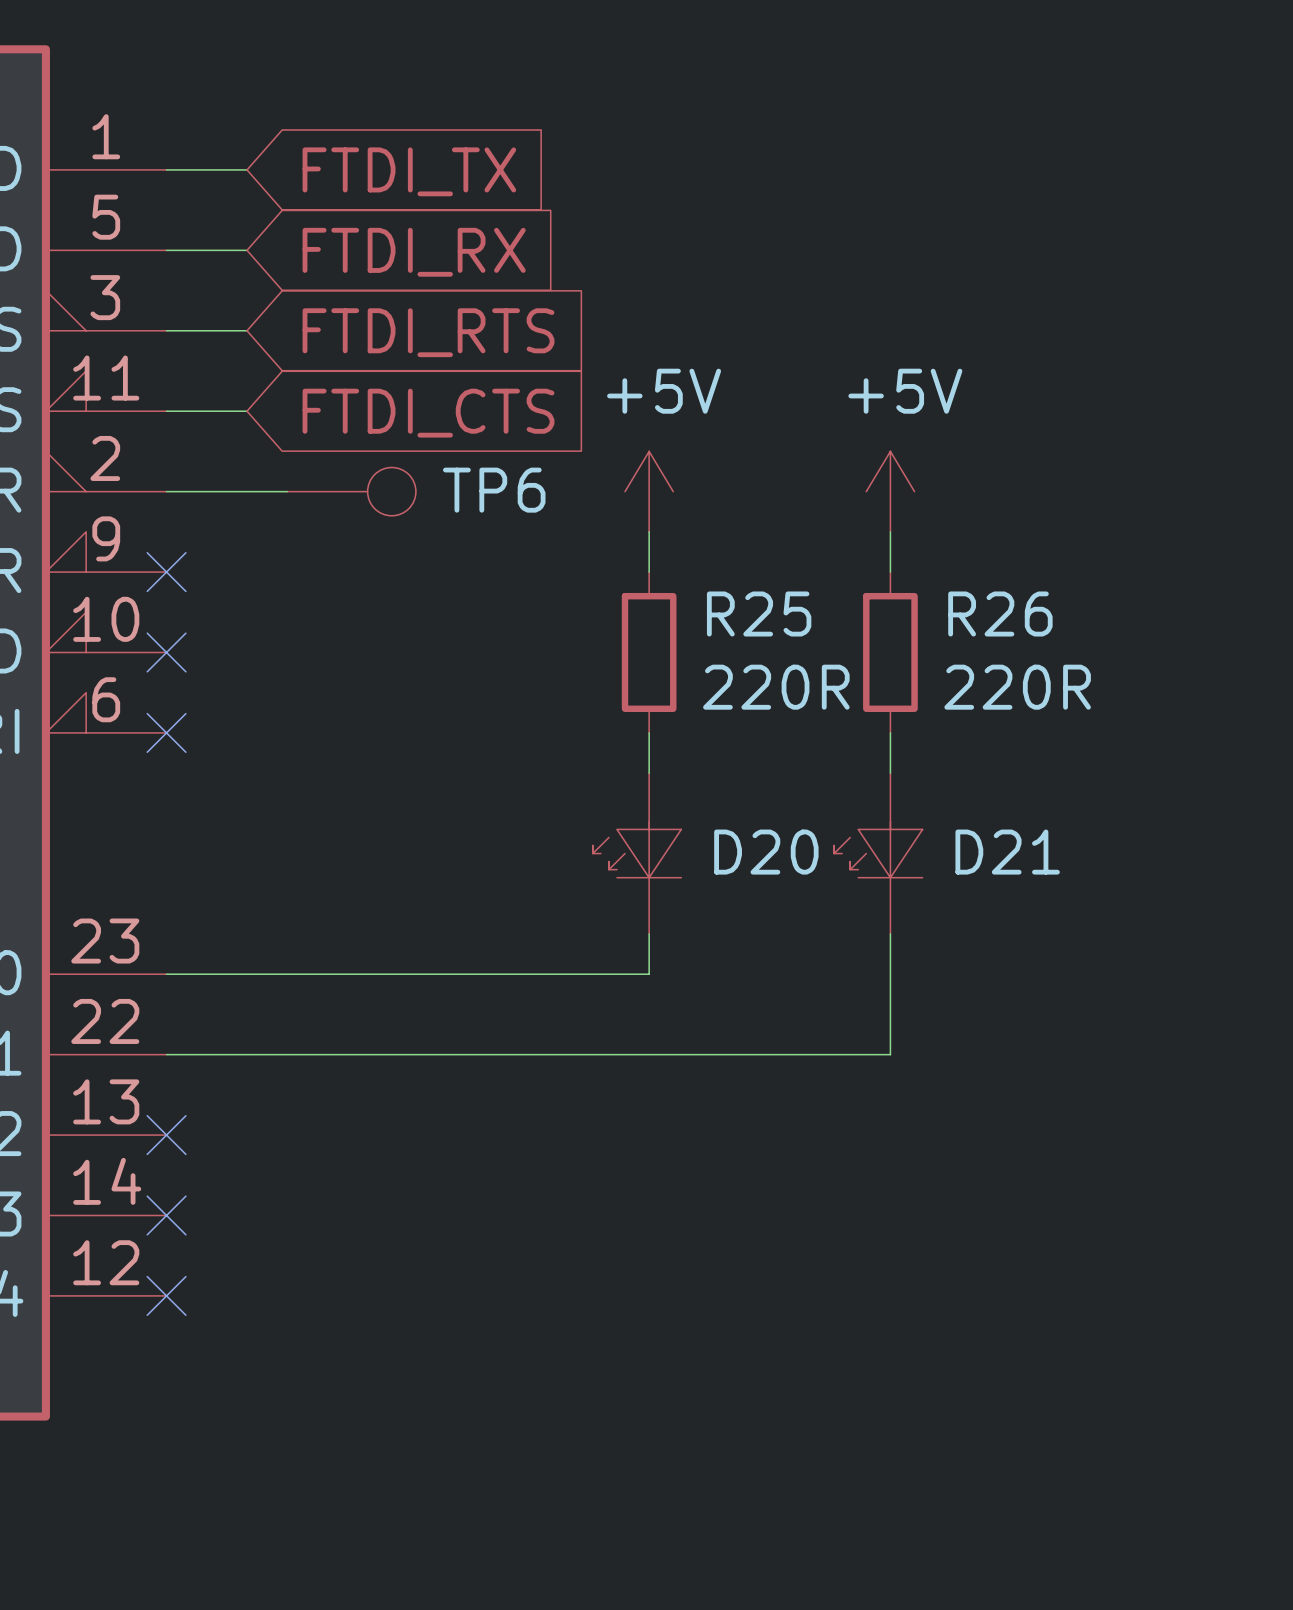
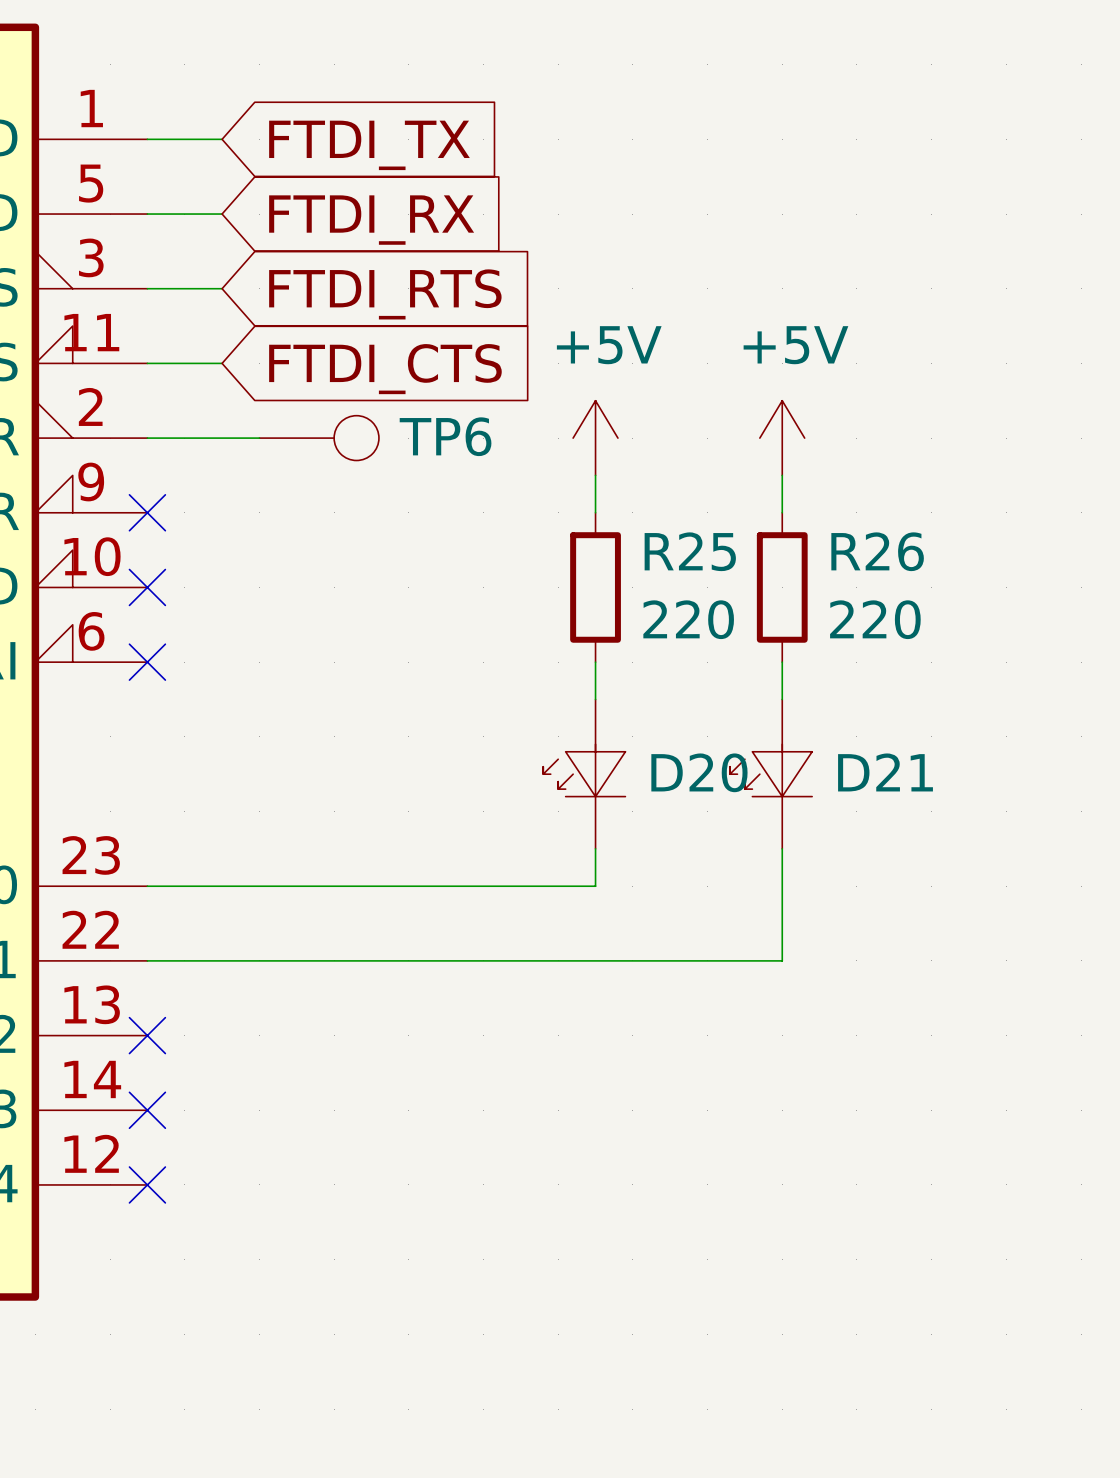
power symbol position: +5V (890, 491) -> +5V (782, 438)
wire: (890, 531) (890, 572) -> (782, 475) (782, 512)
R26 position: (890, 652) -> (782, 587)
R25 value: 220R (776, 687) -> 220 (688, 619)
R26 value: 220R (1017, 687) -> 220 (875, 619)
wire: (890, 732) (890, 773) -> (782, 662) (782, 699)
D21 position: (878, 853) -> (771, 774)
wire: (890, 933) (890, 1054) (850, 1054) -> (782, 848) (782, 960)

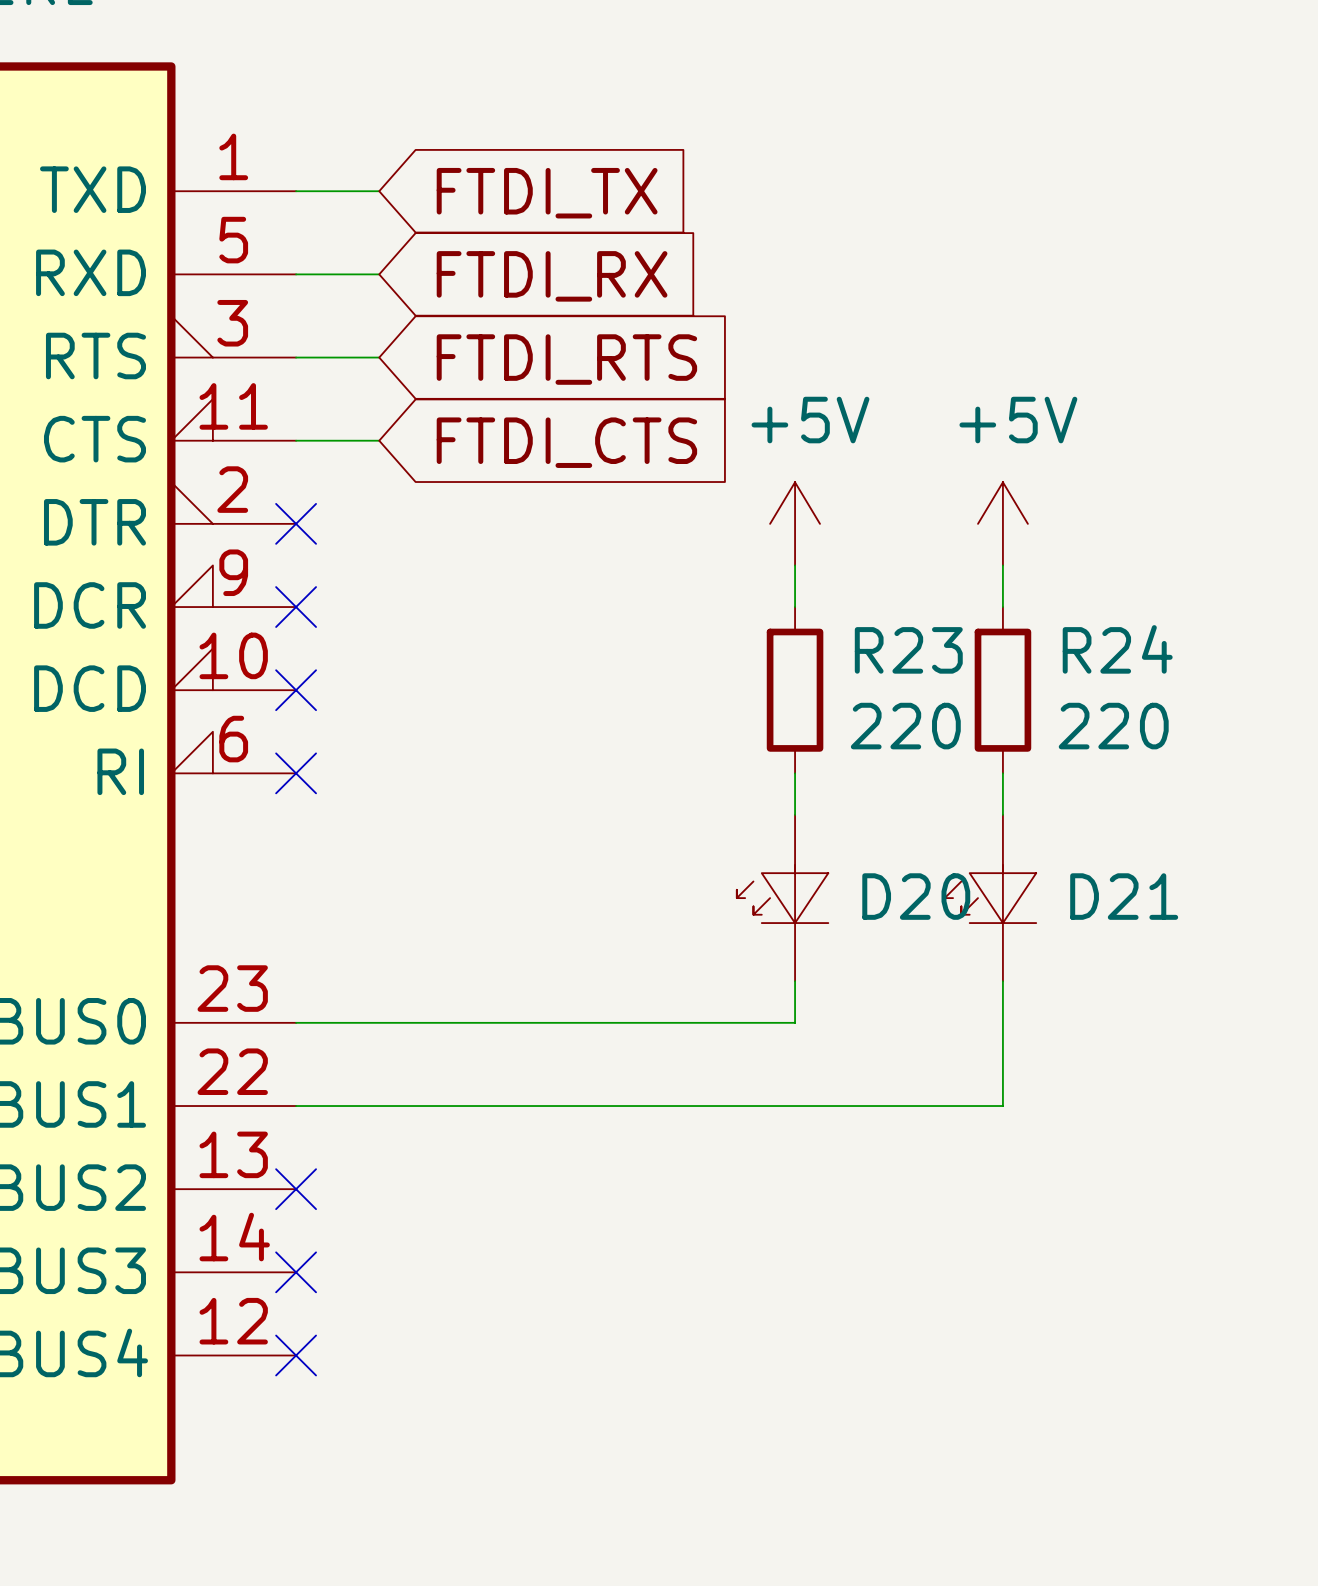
wire: (147, 438) (259, 438) -> none
no-connect mark: none -> (296, 523)
TP6: (319, 438) -> none
R25 name: R25 (690, 551) -> R23 (908, 650)
R26 name: R26 (877, 551) -> R24 (1117, 649)

